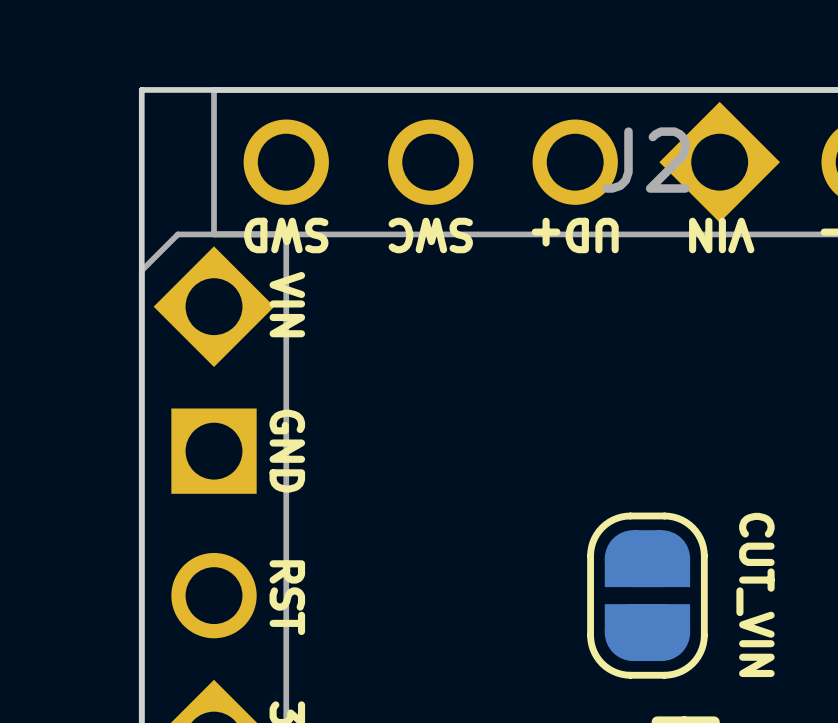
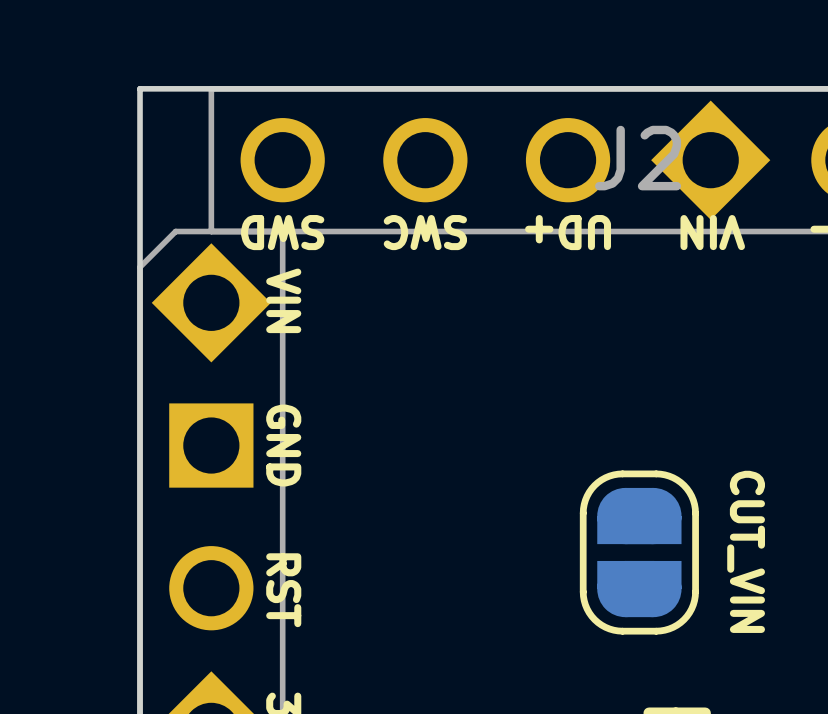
text position: CUT_VIN (755, 594) -> CUT_VIN (746, 551)
part position: (647, 595) -> (639, 552)

